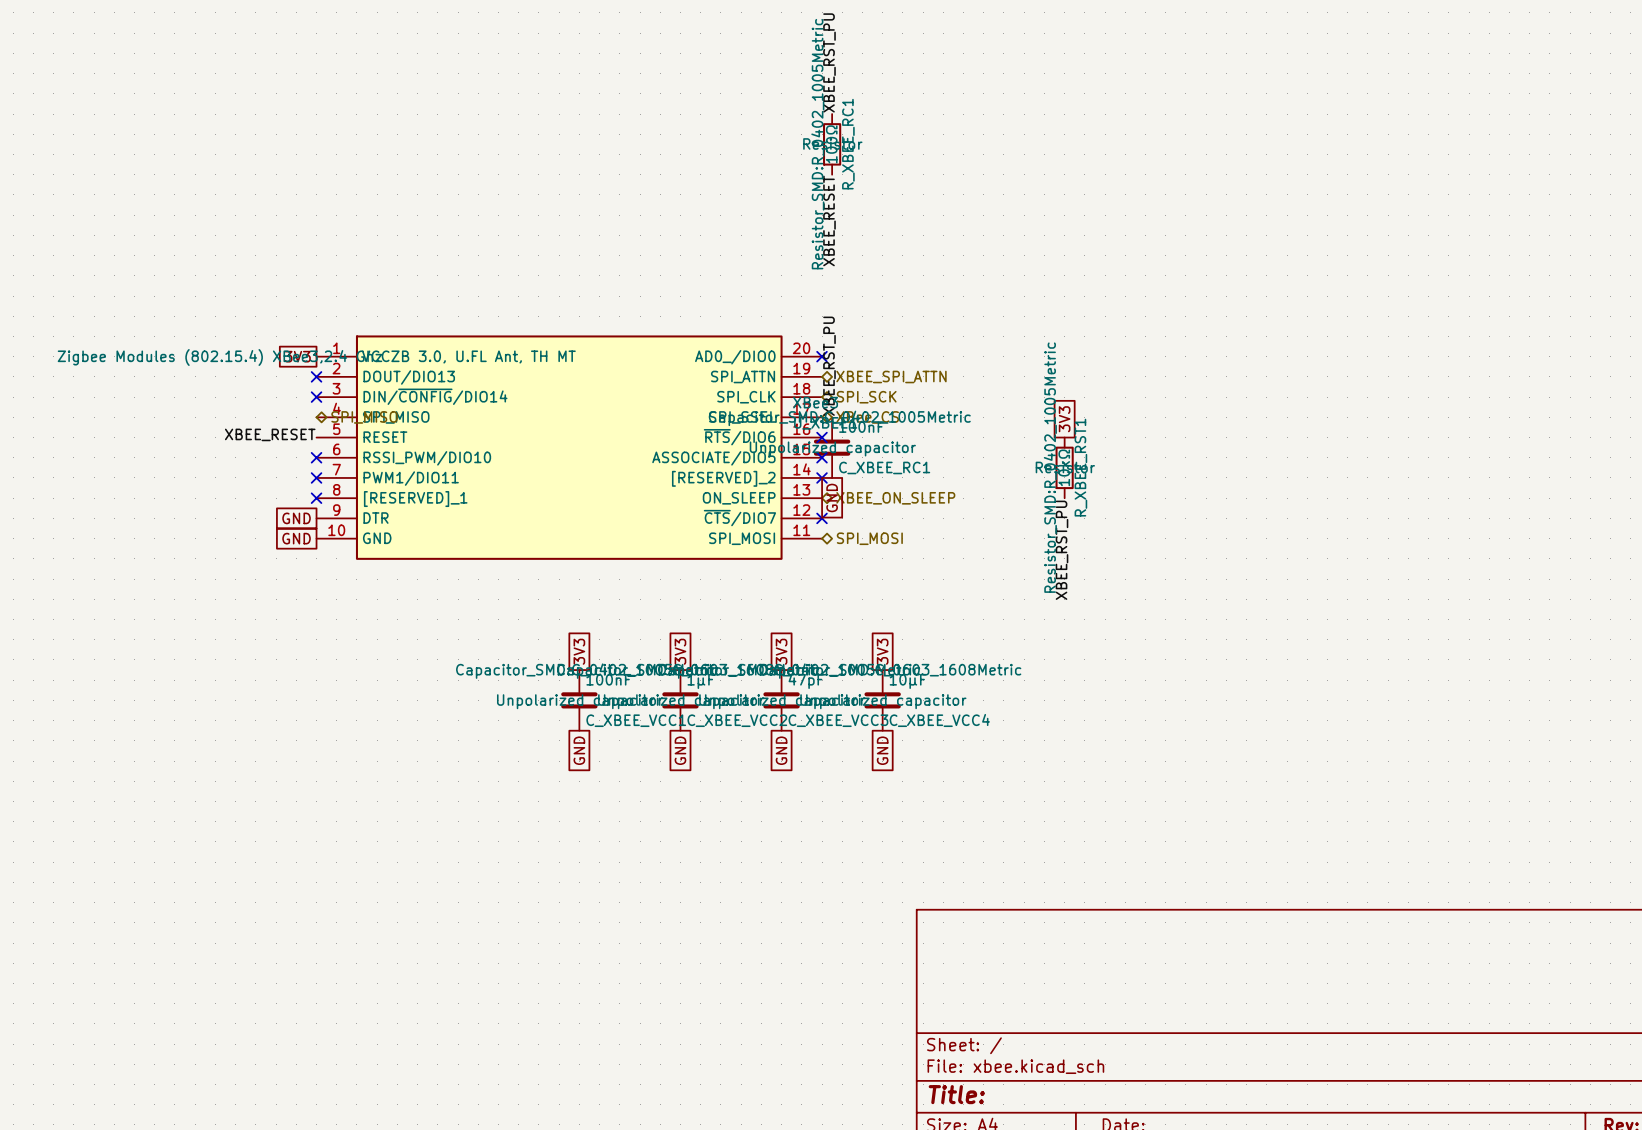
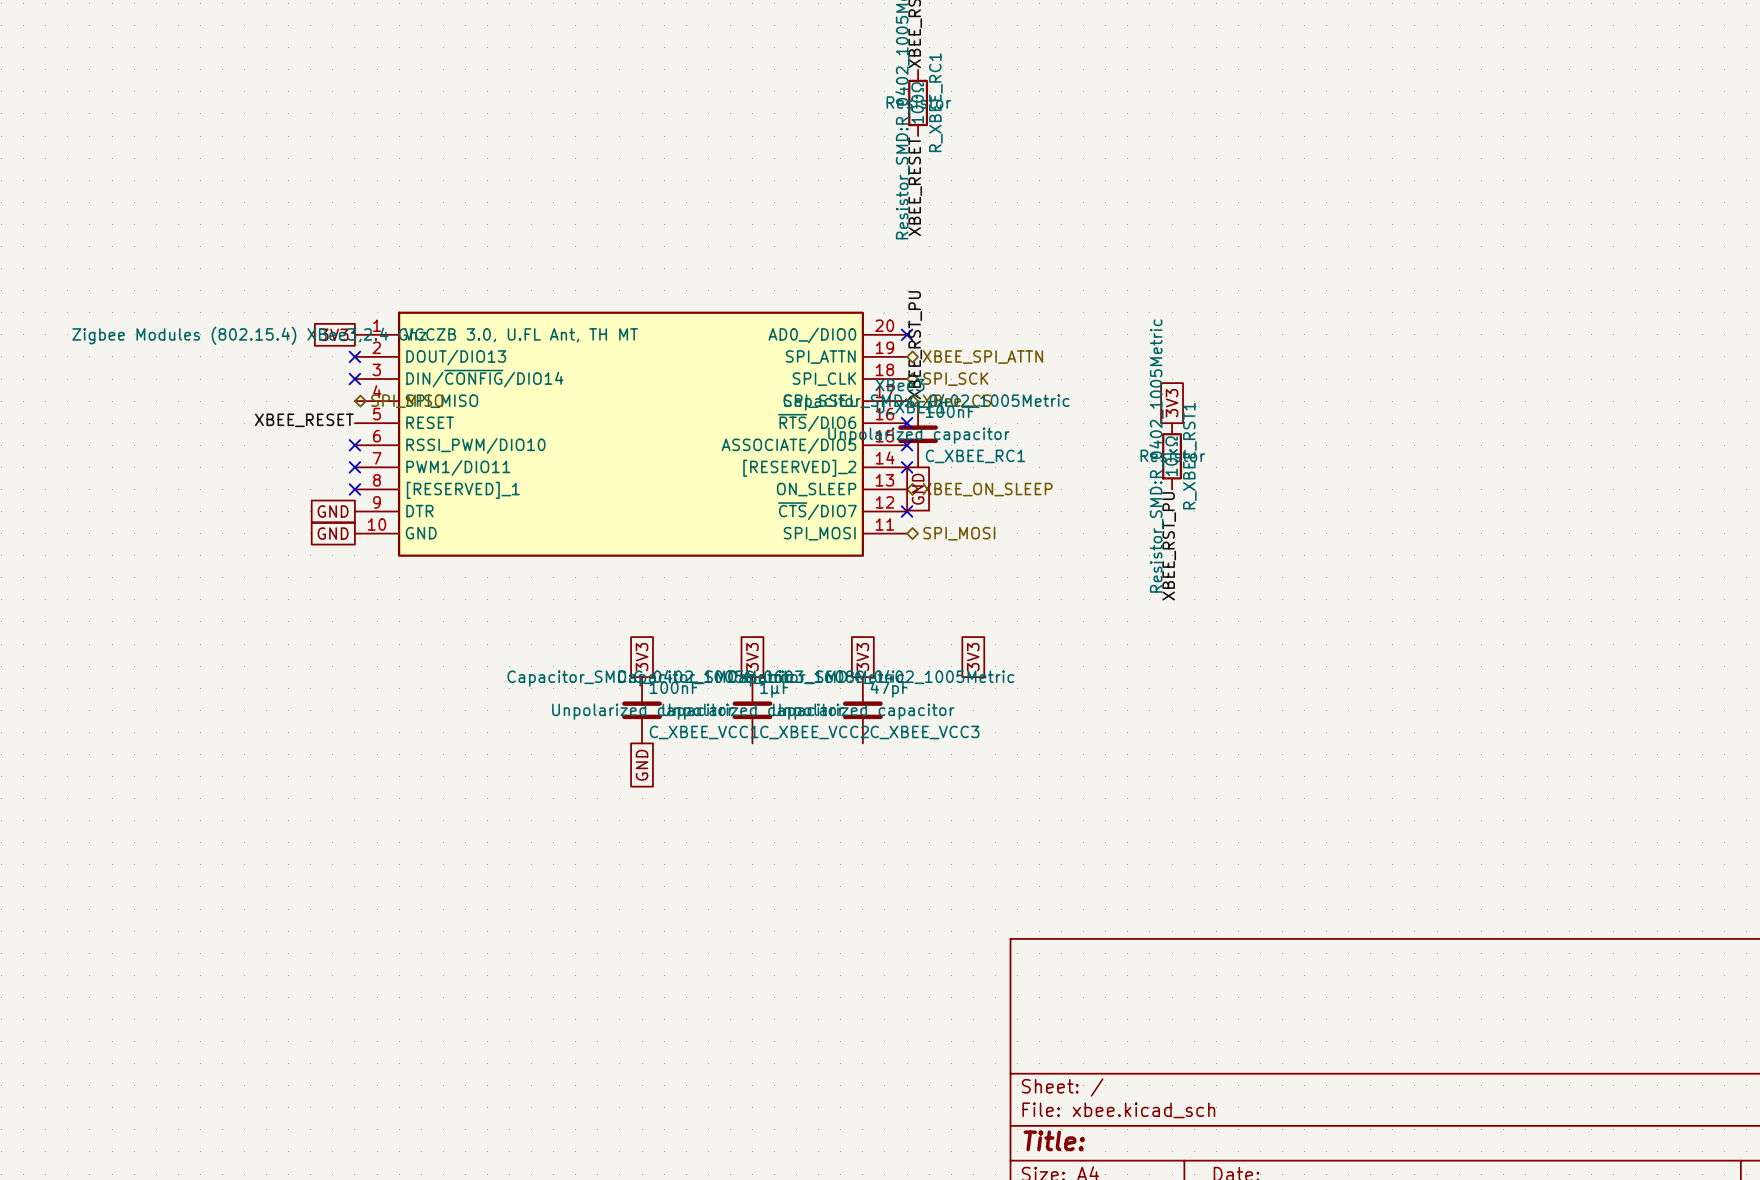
C_XBEE_VCC4: 10µF (882, 700) -> none
global label: GND (680, 750) -> none
global label: GND (781, 750) -> none
global label: GND (882, 750) -> none

